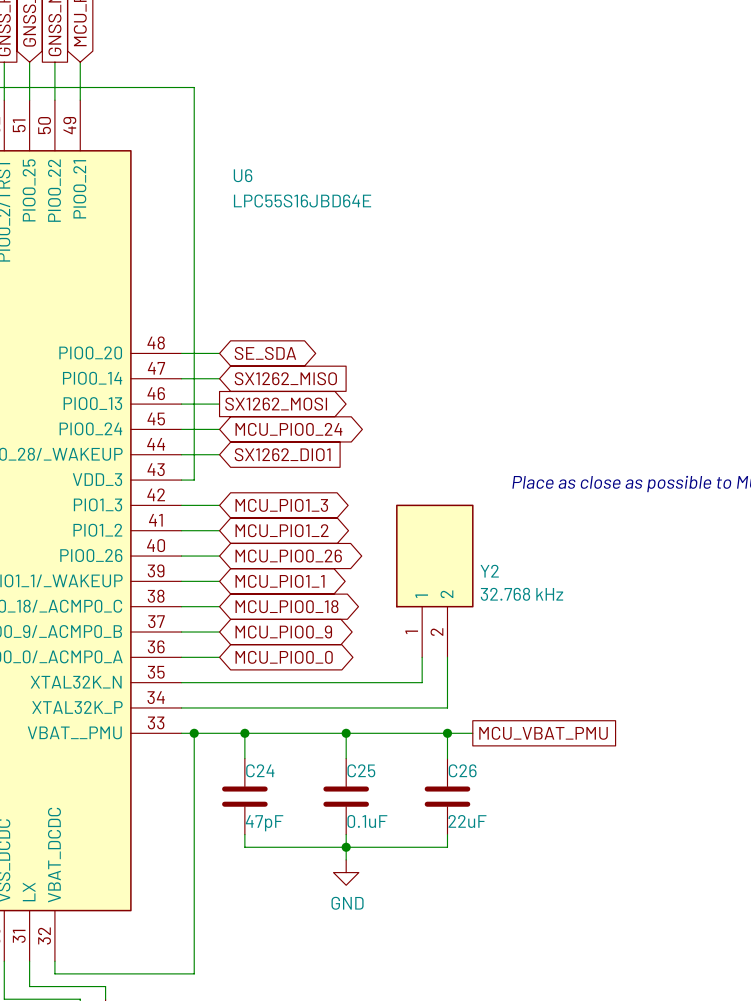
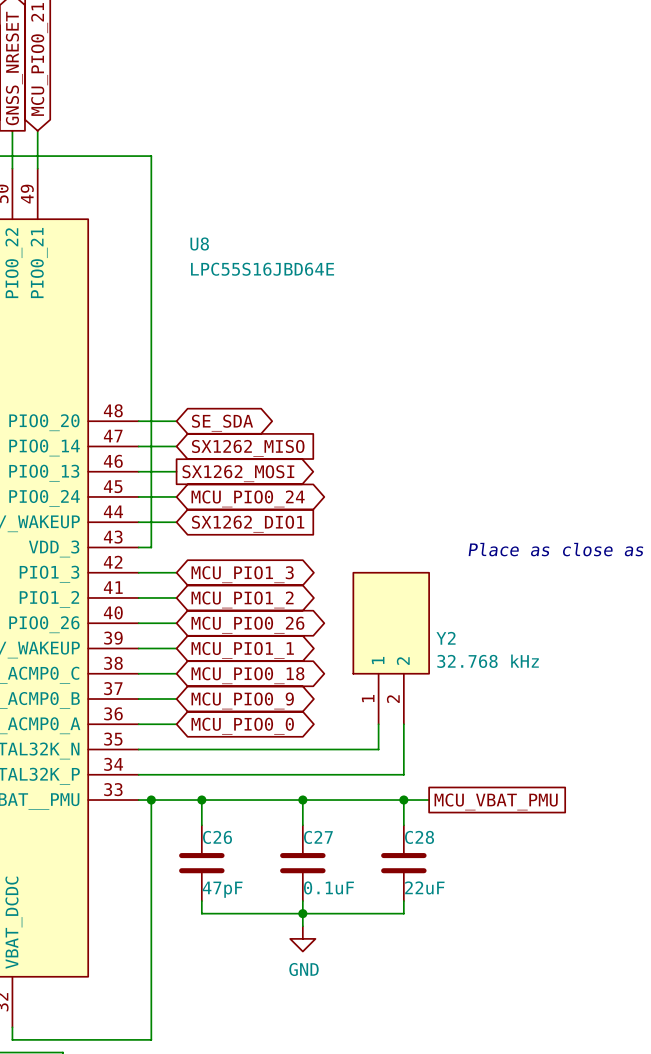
U6 name: U6 (243, 175) -> U8 (199, 243)
C24 name: C24 (260, 770) -> C26 (217, 837)
C25 name: C25 (361, 770) -> C27 (318, 837)
C26 name: C26 (462, 770) -> C28 (419, 837)

